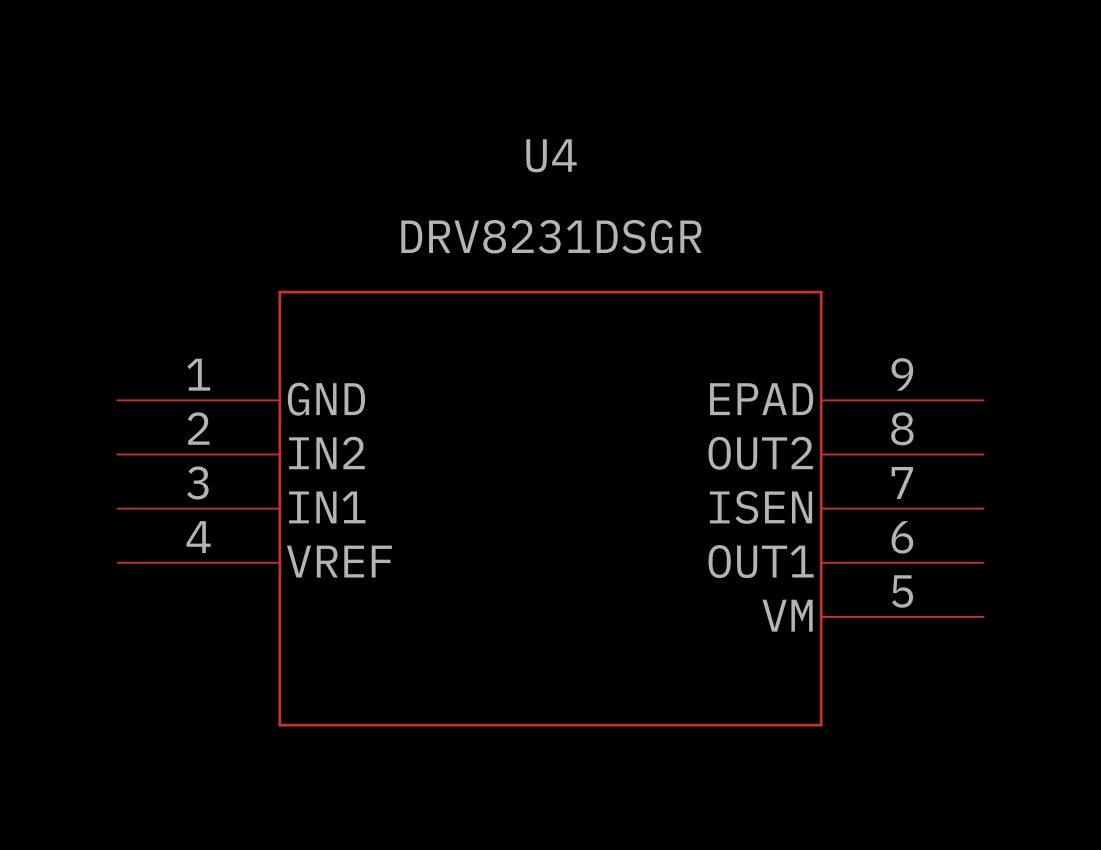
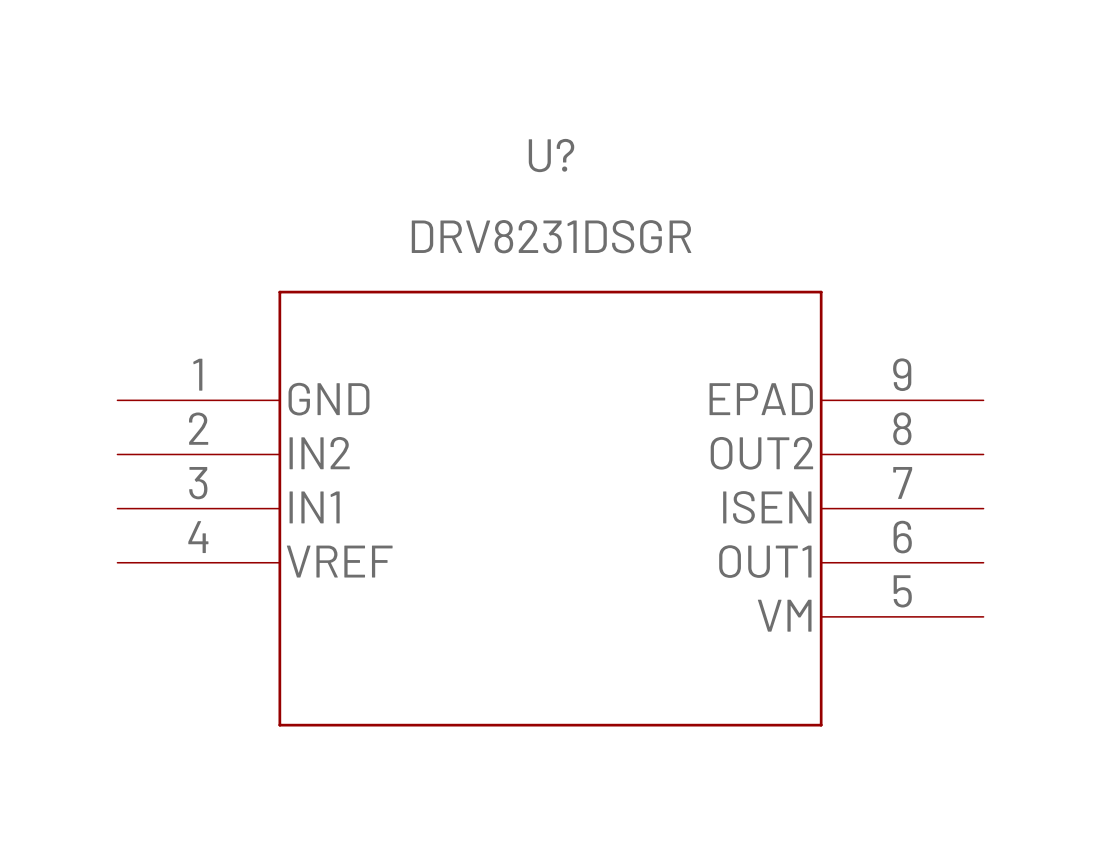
U4 name: U4 (551, 155) -> U? (551, 155)

